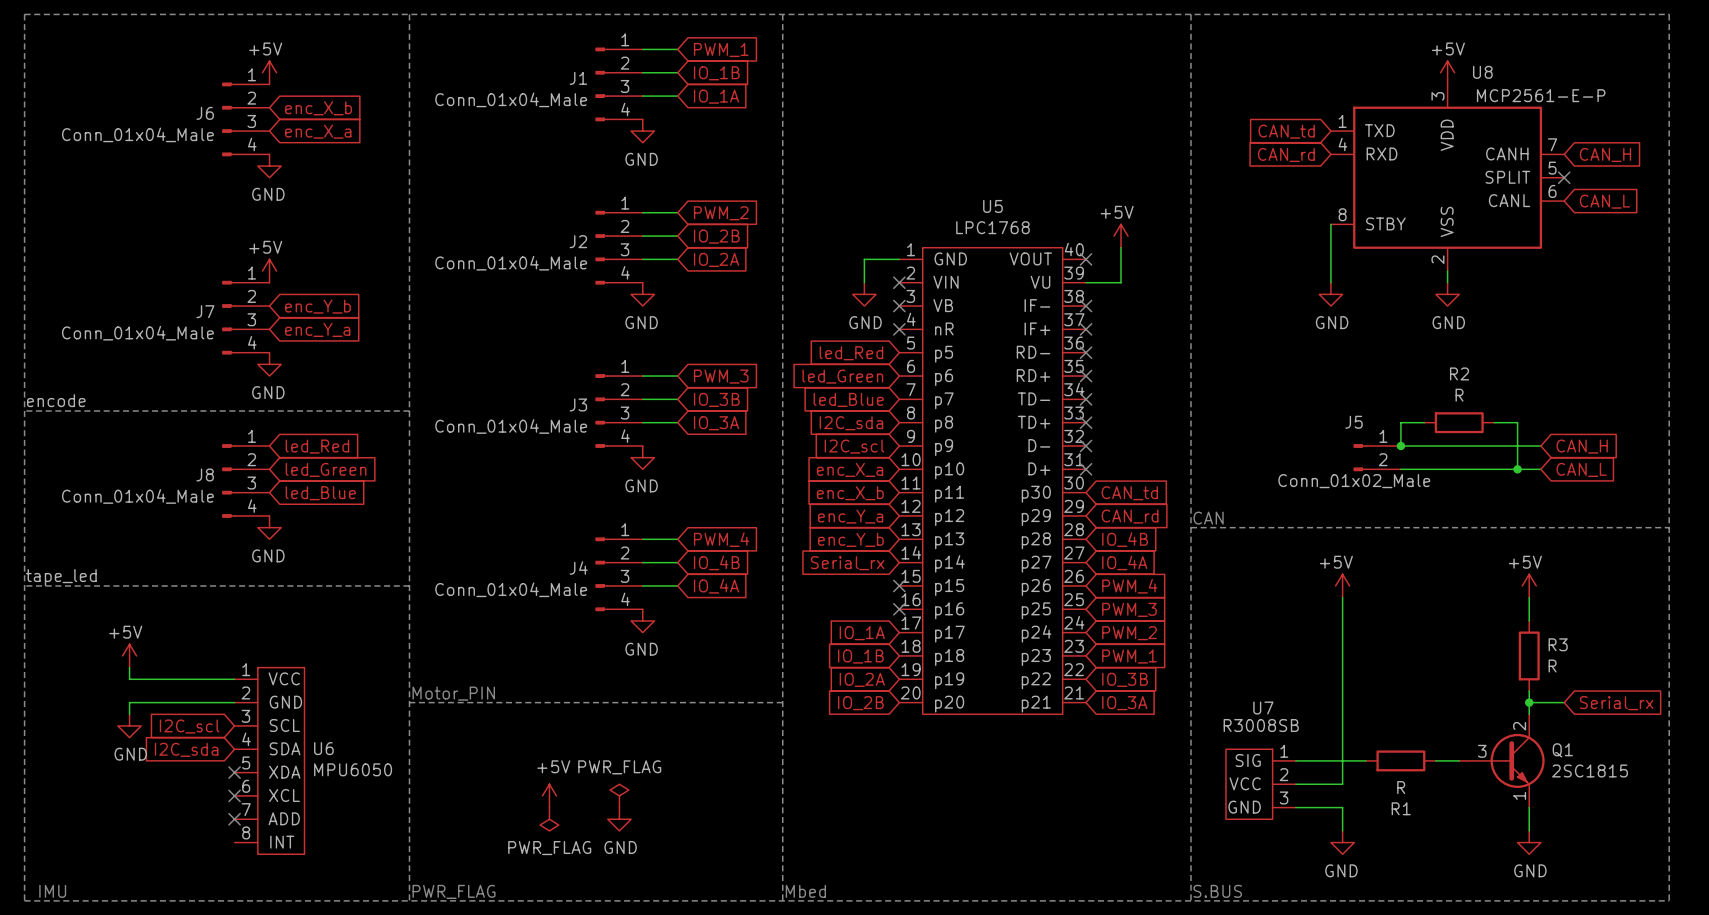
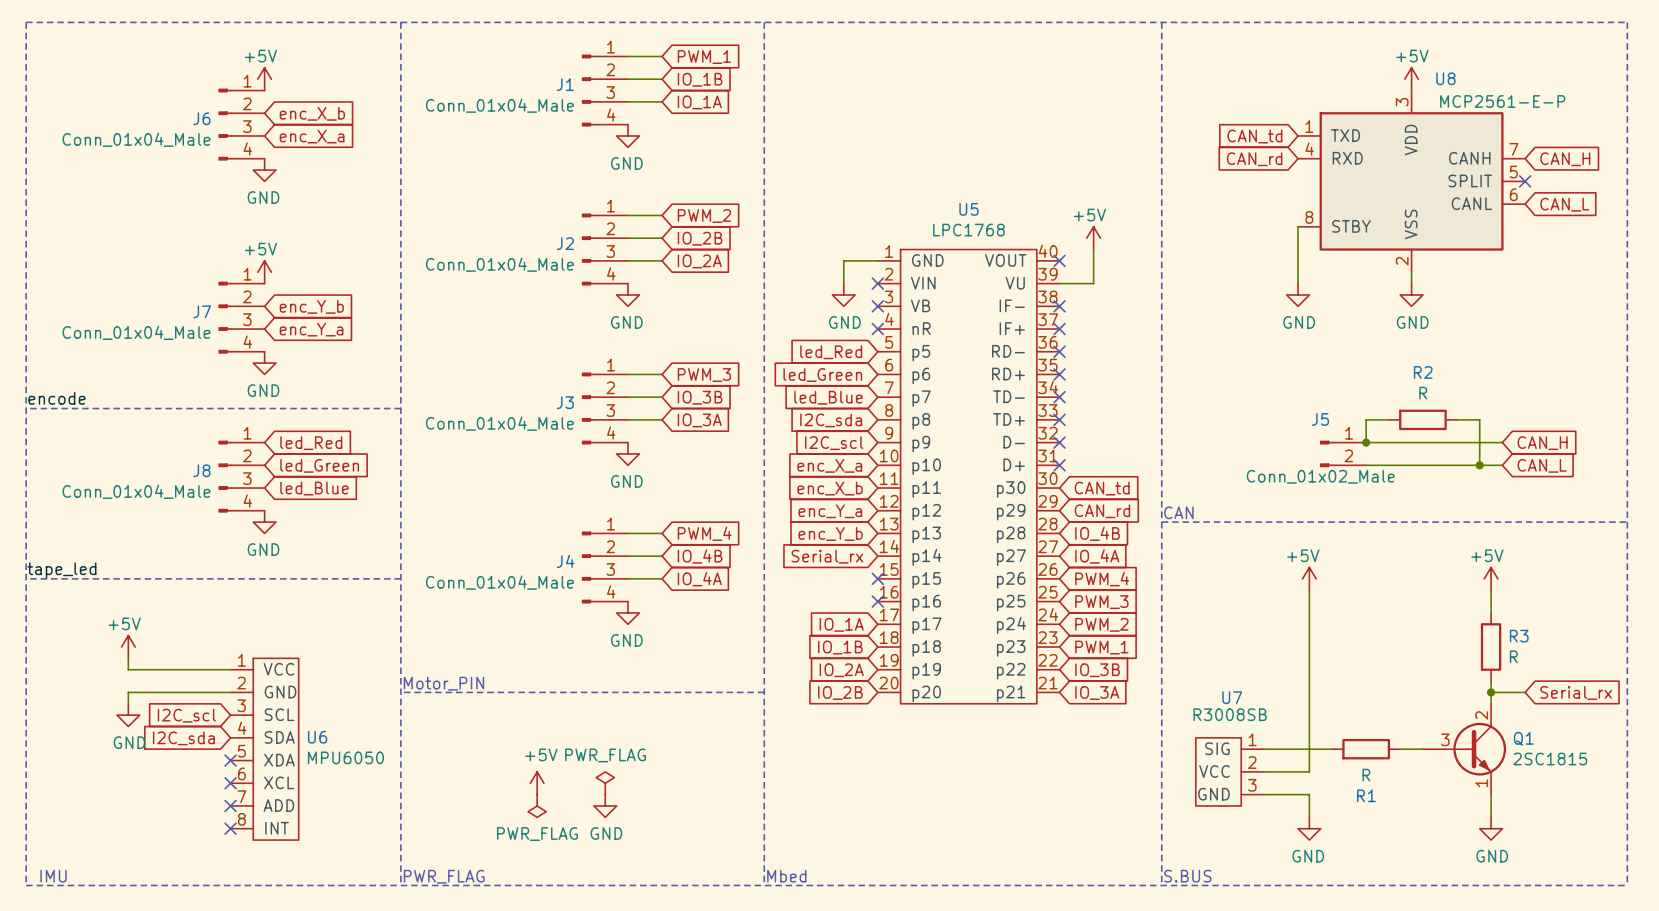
no-connect mark: none -> (230, 828)

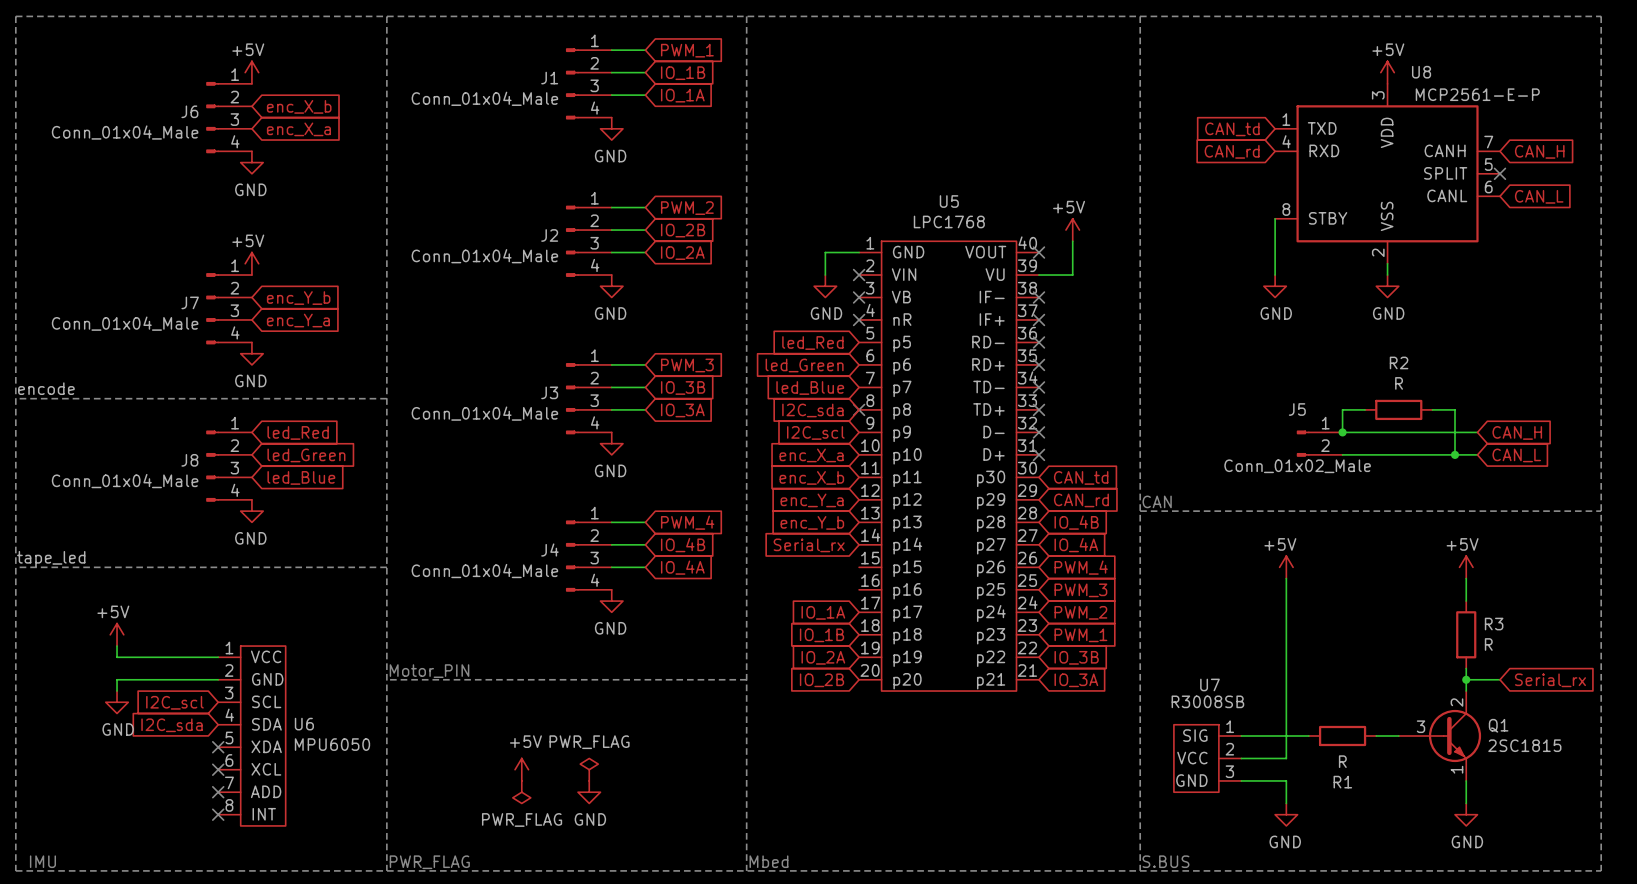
no-connect mark: none -> (859, 409)
no-connect mark: (877, 578) -> none
no-connect mark: (877, 601) -> none

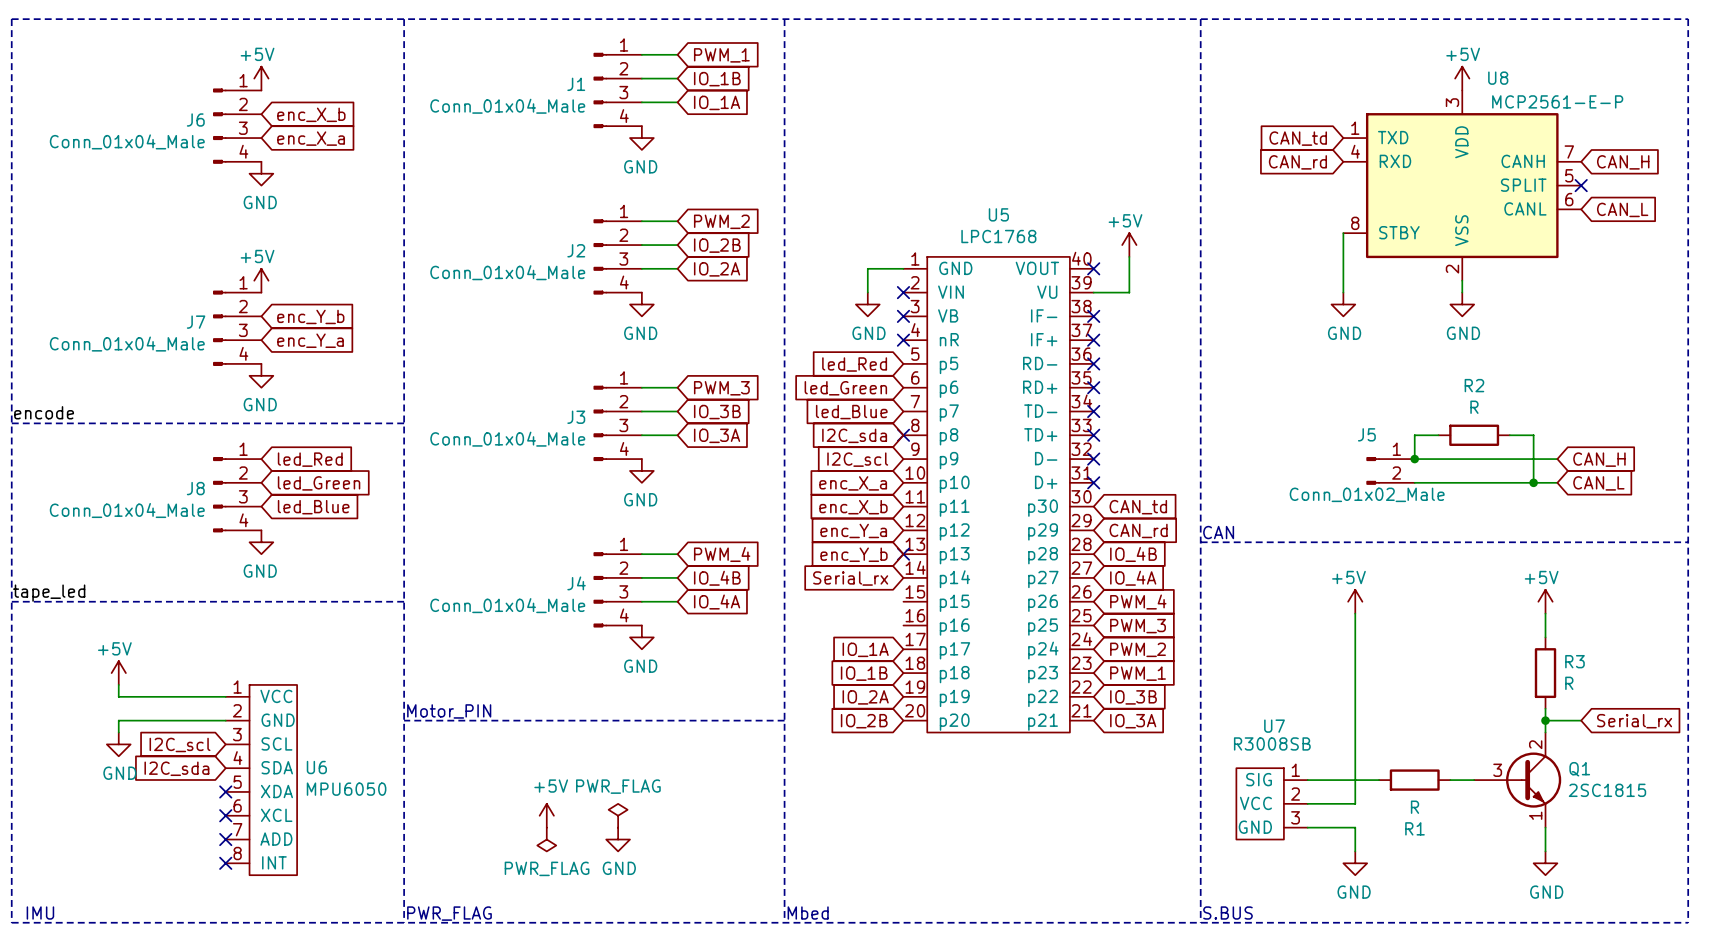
no-connect mark: none -> (903, 554)

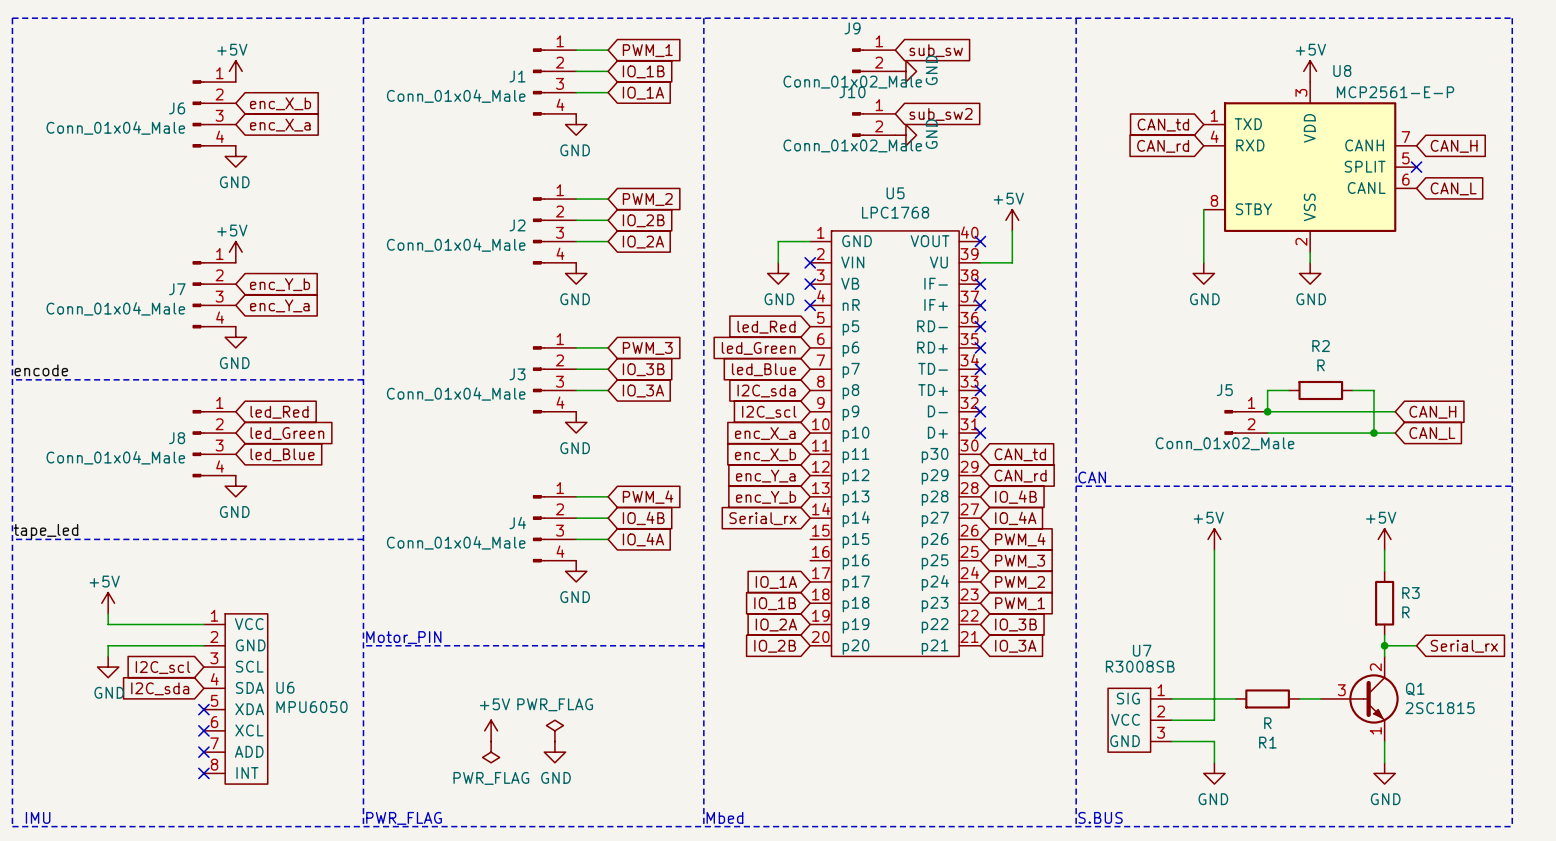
global label: none -> sub_sw (936, 50)
J9: none -> Conn_01x02_Male (873, 60)
power symbol: none -> GND (905, 71)
global label: none -> sub_sw2 (941, 114)
J10: none -> Conn_01x02_Male (873, 124)
power symbol: none -> GND (905, 135)
no-connect mark: (903, 435) -> none
no-connect mark: (903, 554) -> none

